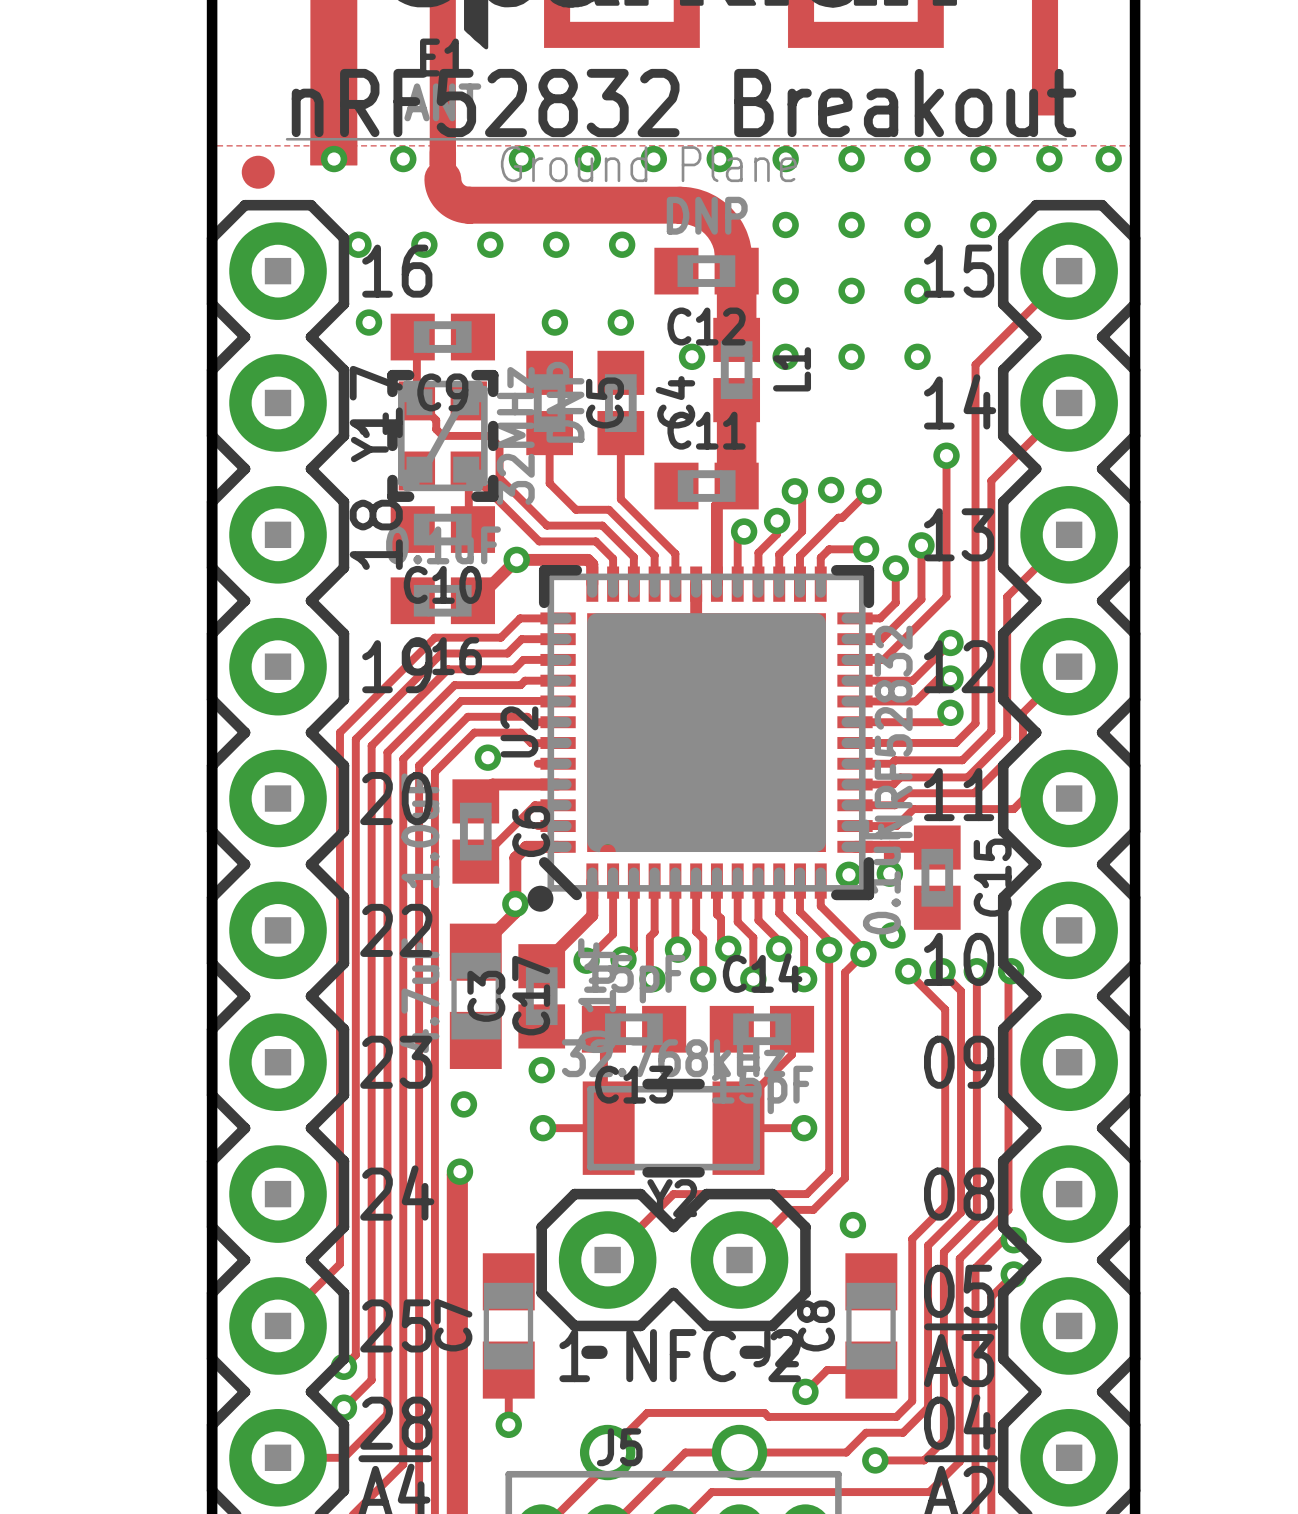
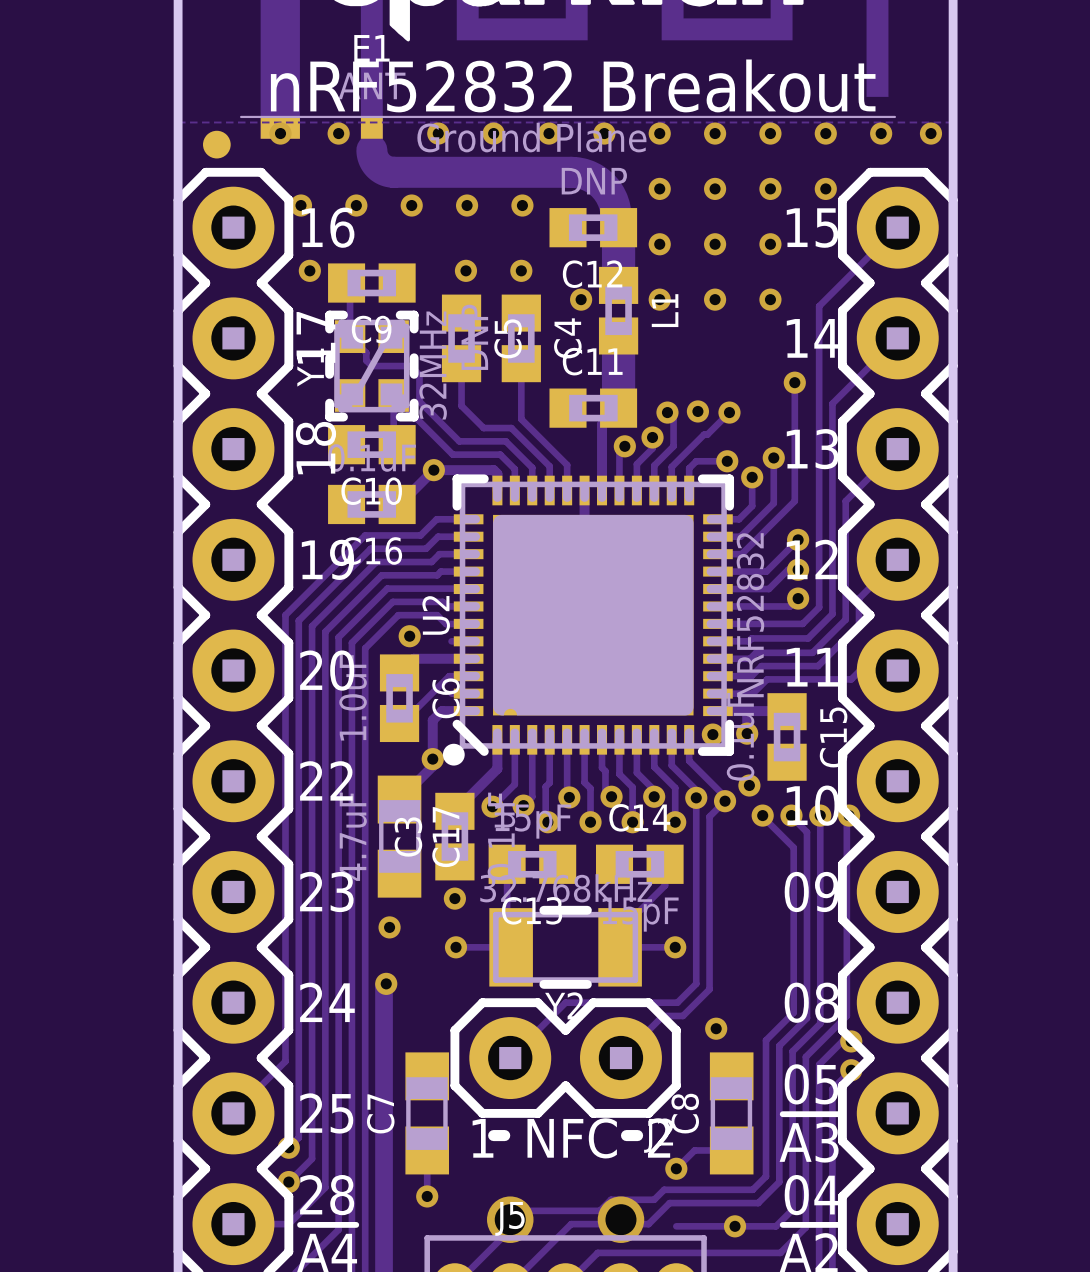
track: (790, 1416) (768, 1416) (764, 1412) (647, 1412) (607, 1452) (607, 1457) -> (664, 1189) (654, 1199) (611, 1199) (599, 1210) (523, 1210) (510, 1224)
track: (866, 1432) (846, 1452) (685, 1452) (680, 1457) -> (727, 1203) (669, 1203) (648, 1224) (571, 1224)
track: none -> (676, 1226) (735, 1226)

